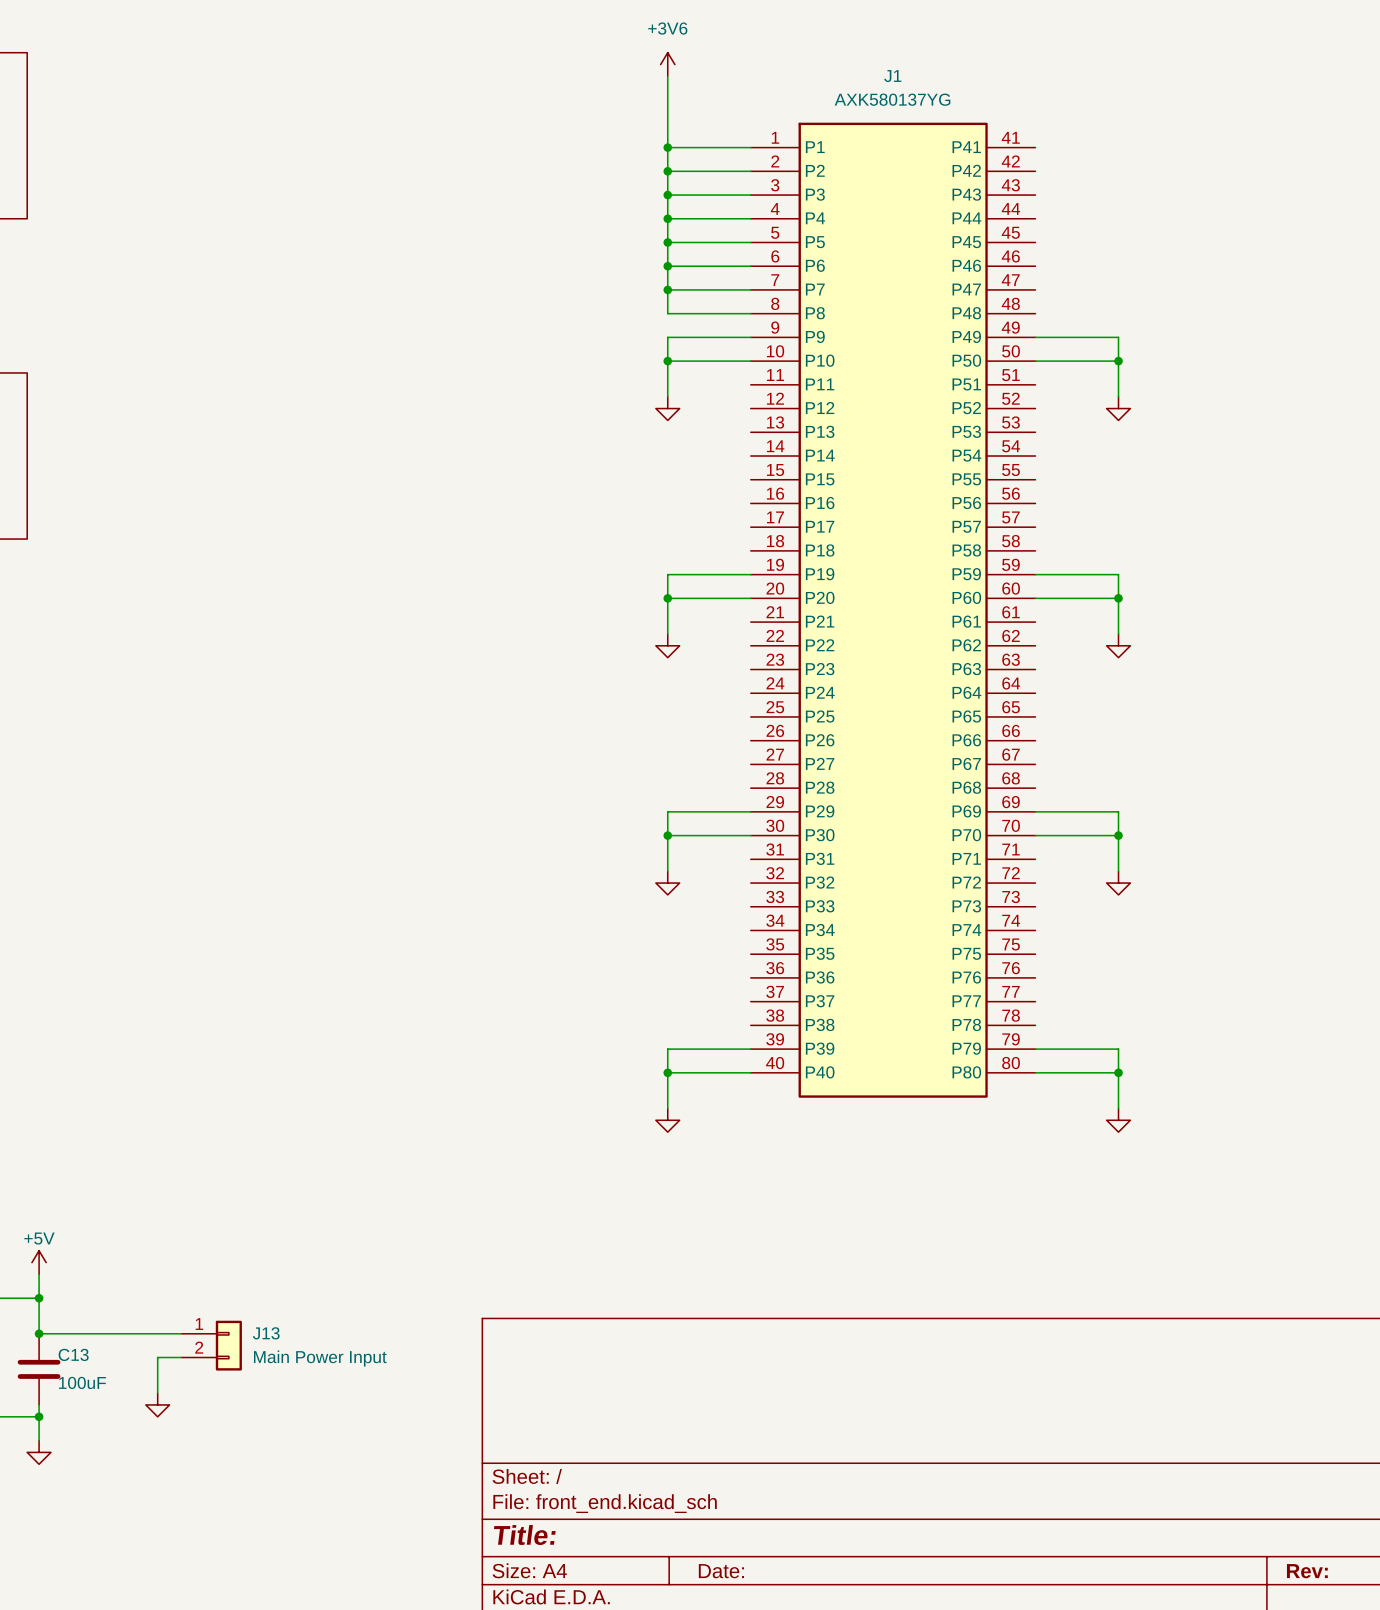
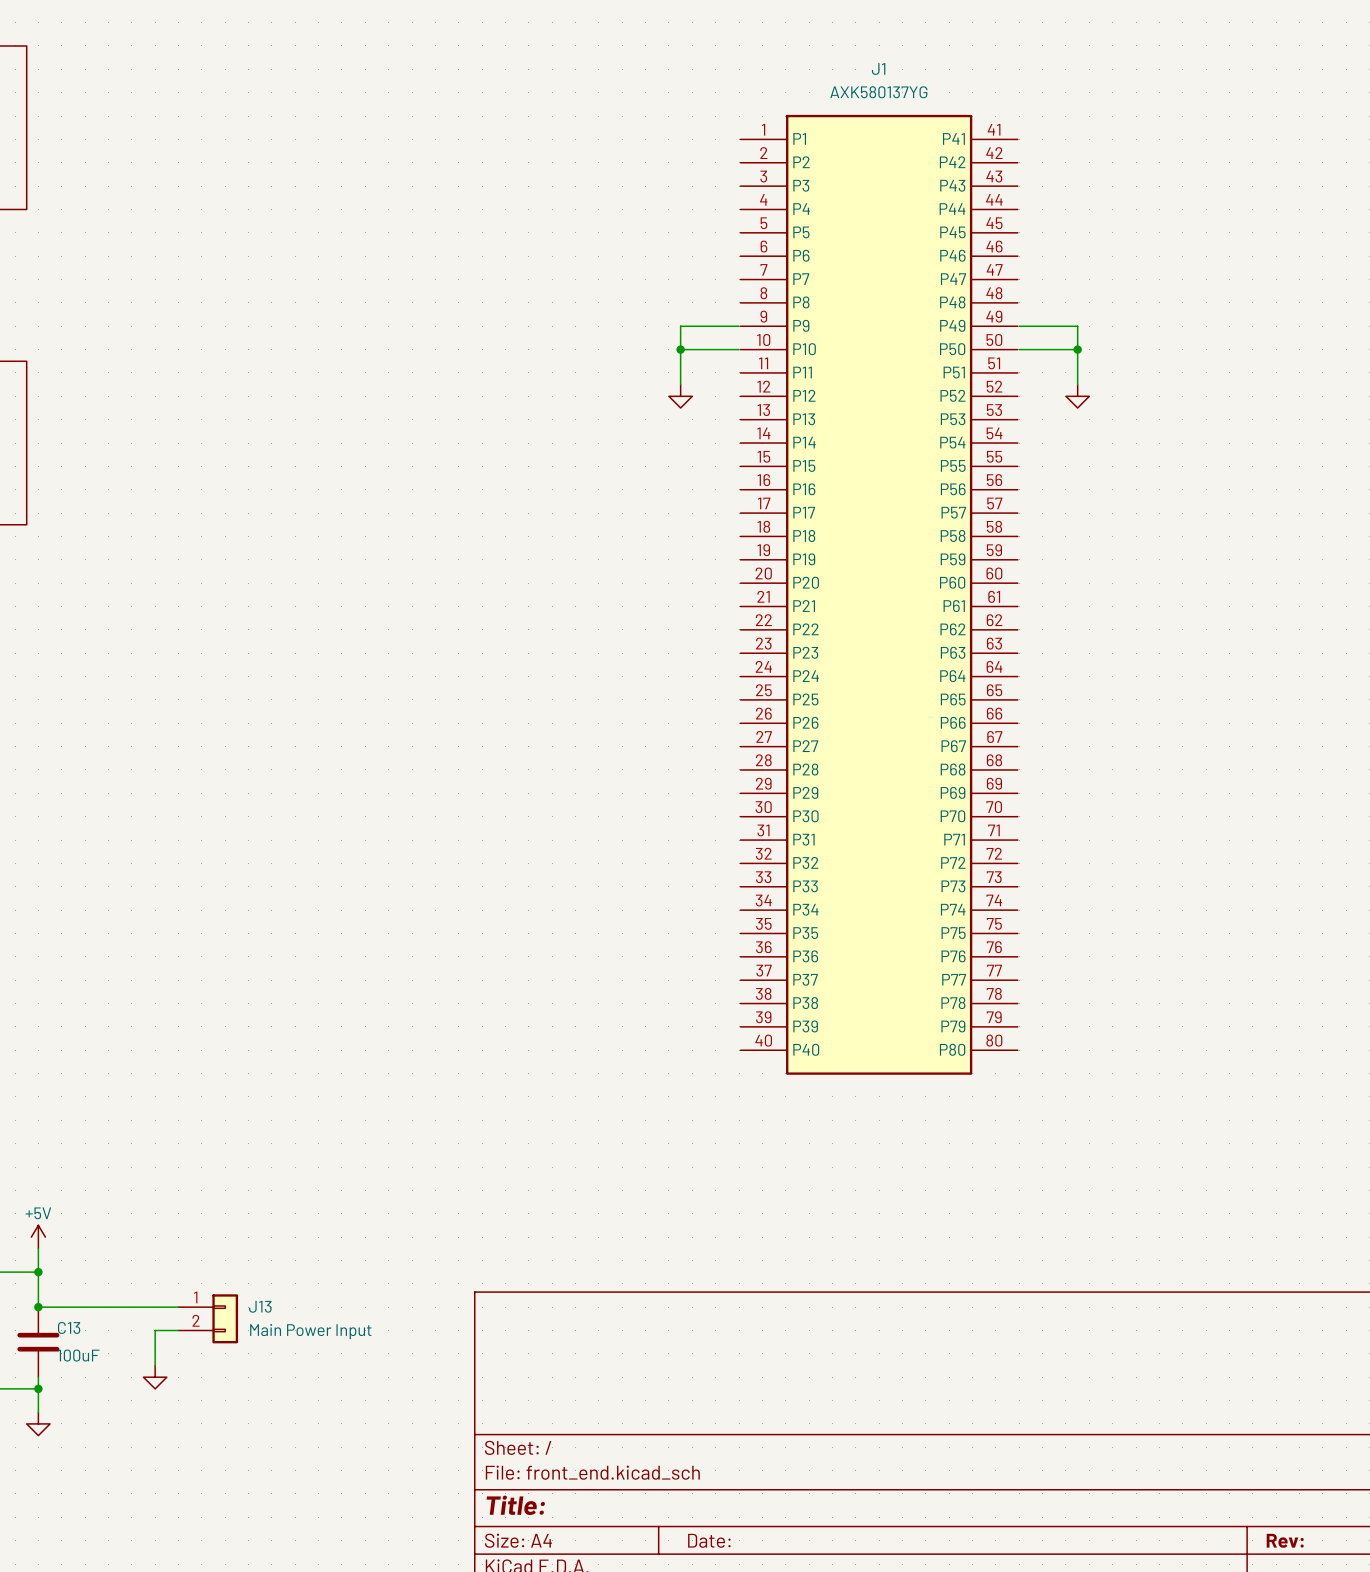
power symbol: +3V6 (667, 64) -> none
wire: (667, 76) (667, 313) (750, 313) -> none
J1 symbol: [750, 122, 1036, 1098] -> [740, 114, 1018, 1075]
wire: (667, 147) (750, 147) -> none
junction: (667, 147) -> none
wire: (667, 171) (750, 171) -> none
junction: (667, 171) -> none
wire: (667, 195) (750, 195) -> none
junction: (667, 195) -> none
wire: (667, 218) (750, 218) -> none
junction: (667, 218) -> none
wire: (667, 242) (750, 242) -> none
junction: (667, 242) -> none
wire: (667, 266) (750, 266) -> none
junction: (667, 266) -> none
wire: (667, 289) (750, 289) -> none
junction: (667, 289) -> none
wire: (691, 337) (667, 337) (667, 396) -> (680, 326) (680, 384)
wire: (1094, 337) (1118, 337) (1118, 396) -> (1077, 326) (1077, 384)
wire: (667, 361) (691, 361) -> none
junction position: (667, 361) -> (680, 349)
wire: (1094, 361) (1118, 361) -> none
junction position: (1118, 361) -> (1077, 349)
power symbol position: (667, 408) -> (680, 396)
power symbol position: (1118, 408) -> (1077, 396)
wire: (750, 574) (667, 574) (667, 633) -> none
wire: (1035, 574) (1118, 574) (1118, 633) -> none
wire: (667, 598) (750, 598) -> none
junction: (667, 598) -> none
wire: (1035, 598) (1118, 598) -> none
junction: (1118, 598) -> none
power symbol: (667, 645) -> none
power symbol: (1118, 645) -> none
wire: (750, 811) (667, 811) (667, 871) -> none
wire: (1035, 811) (1118, 811) (1118, 871) -> none
wire: (667, 835) (750, 835) -> none
junction: (667, 835) -> none
wire: (1035, 835) (1118, 835) -> none
junction: (1118, 835) -> none
power symbol: (667, 883) -> none
power symbol: (1118, 883) -> none
wire: (750, 1049) (667, 1049) (667, 1108) -> none
wire: (1035, 1049) (1118, 1049) (1118, 1108) -> none
wire: (667, 1072) (750, 1072) -> none
junction: (667, 1072) -> none
wire: (1035, 1072) (1118, 1072) -> none
junction: (1118, 1072) -> none
power symbol: (667, 1120) -> none
power symbol: (1118, 1120) -> none

